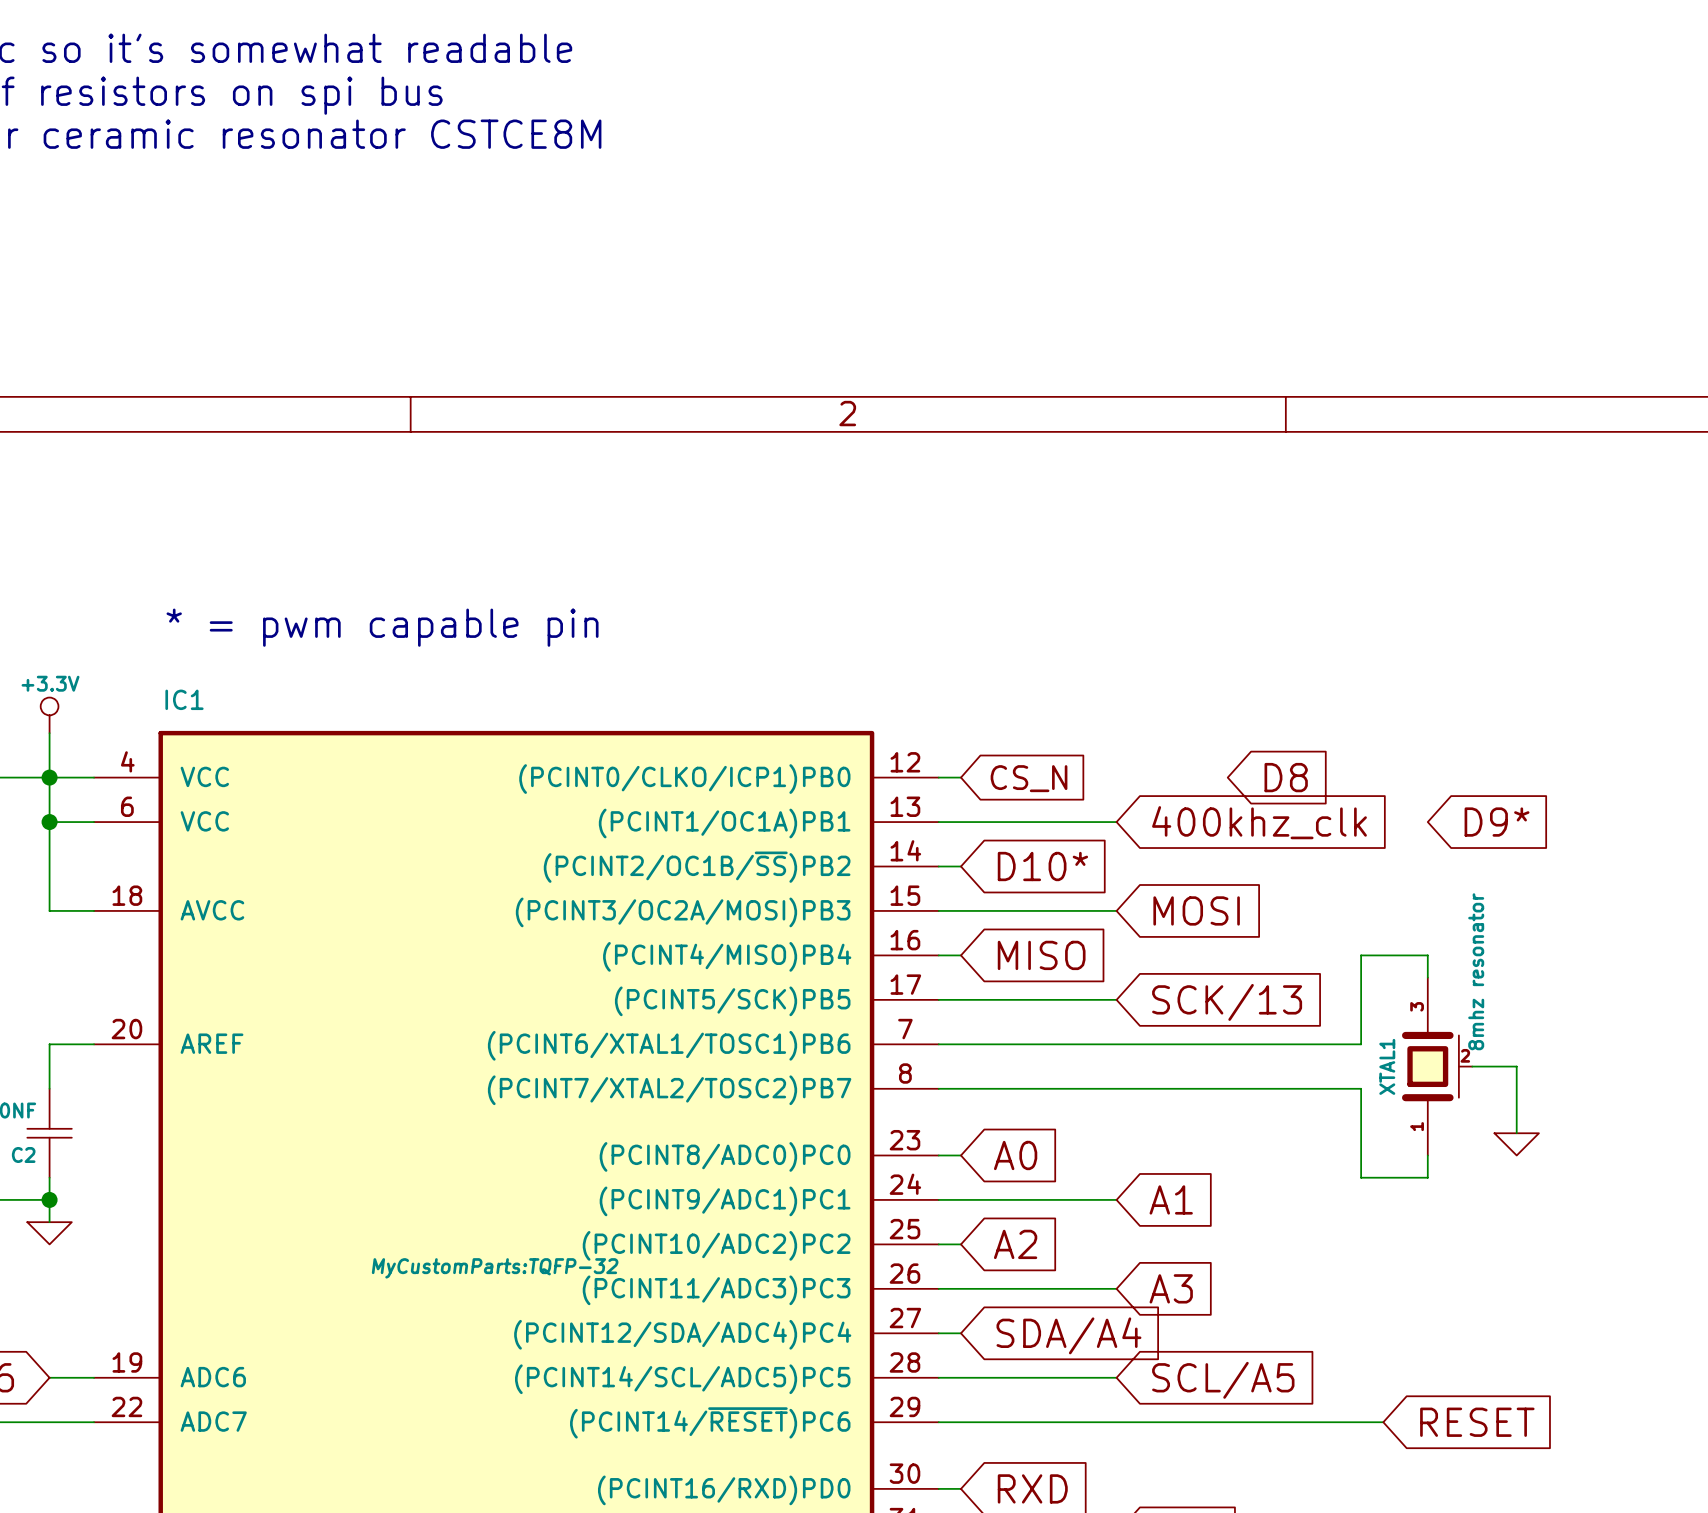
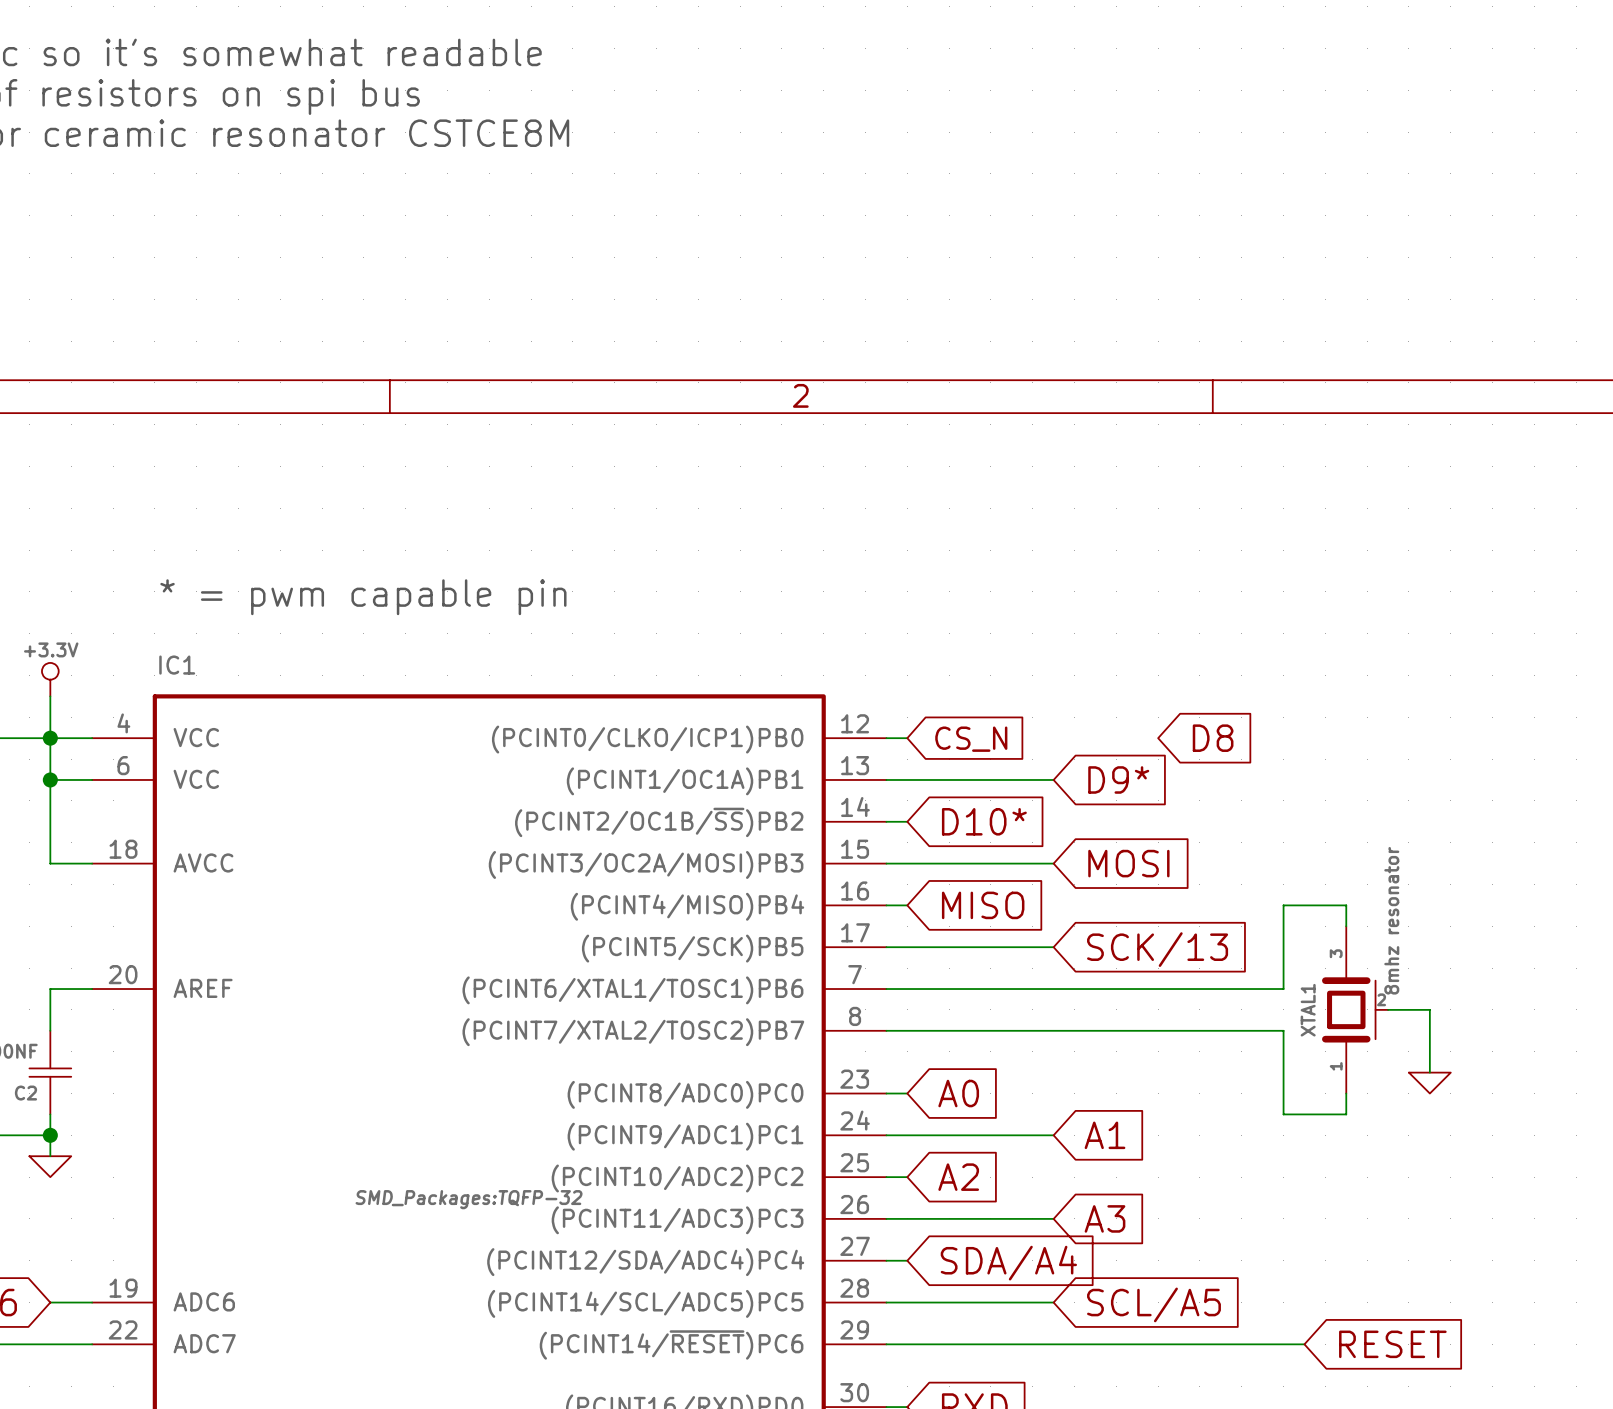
global label: 400khz_clk (1259, 822) -> D9* (1118, 779)
global label: D9* (1497, 822) -> none
IC1 text: MyCustomParts:TQFP-32 (495, 1268) -> SMD_Packages:TQFP-32 (469, 1199)

